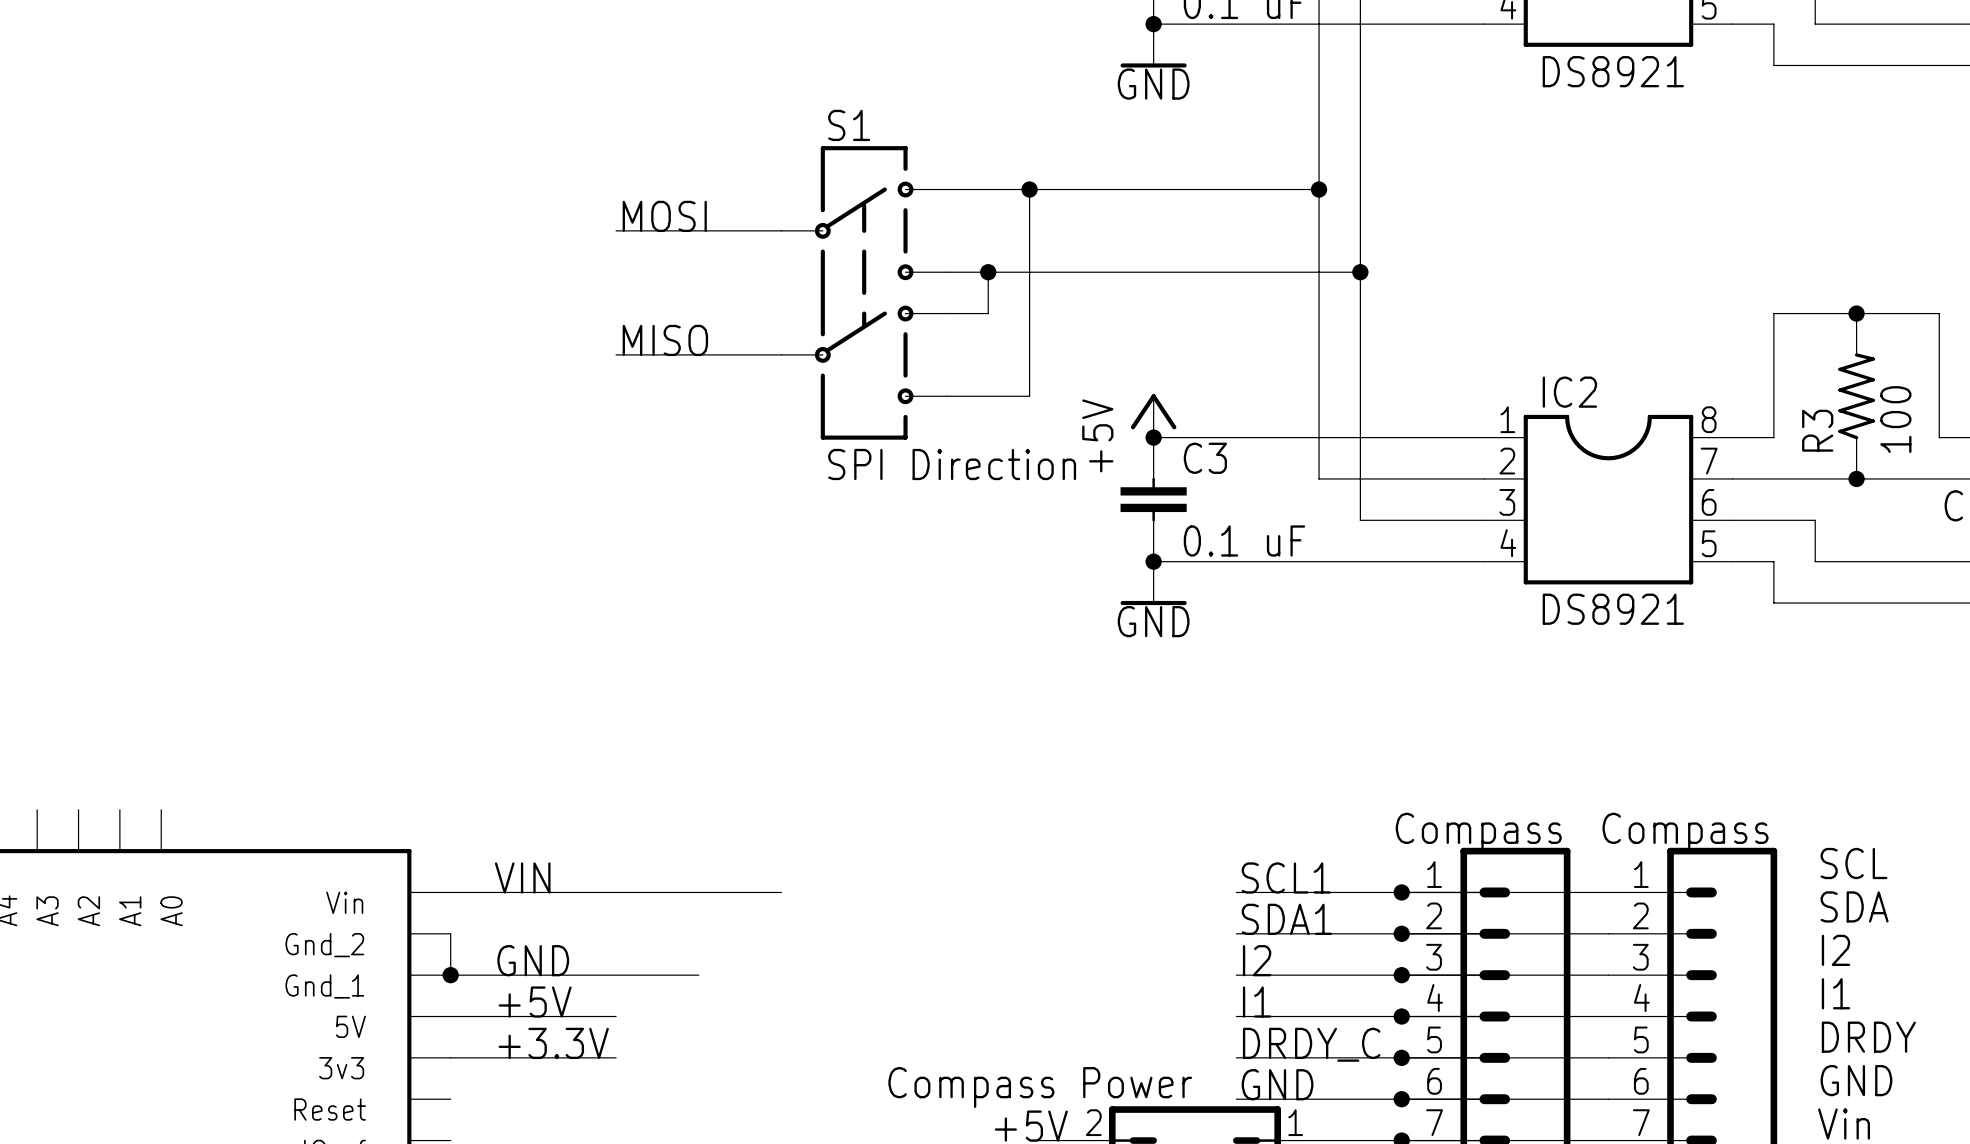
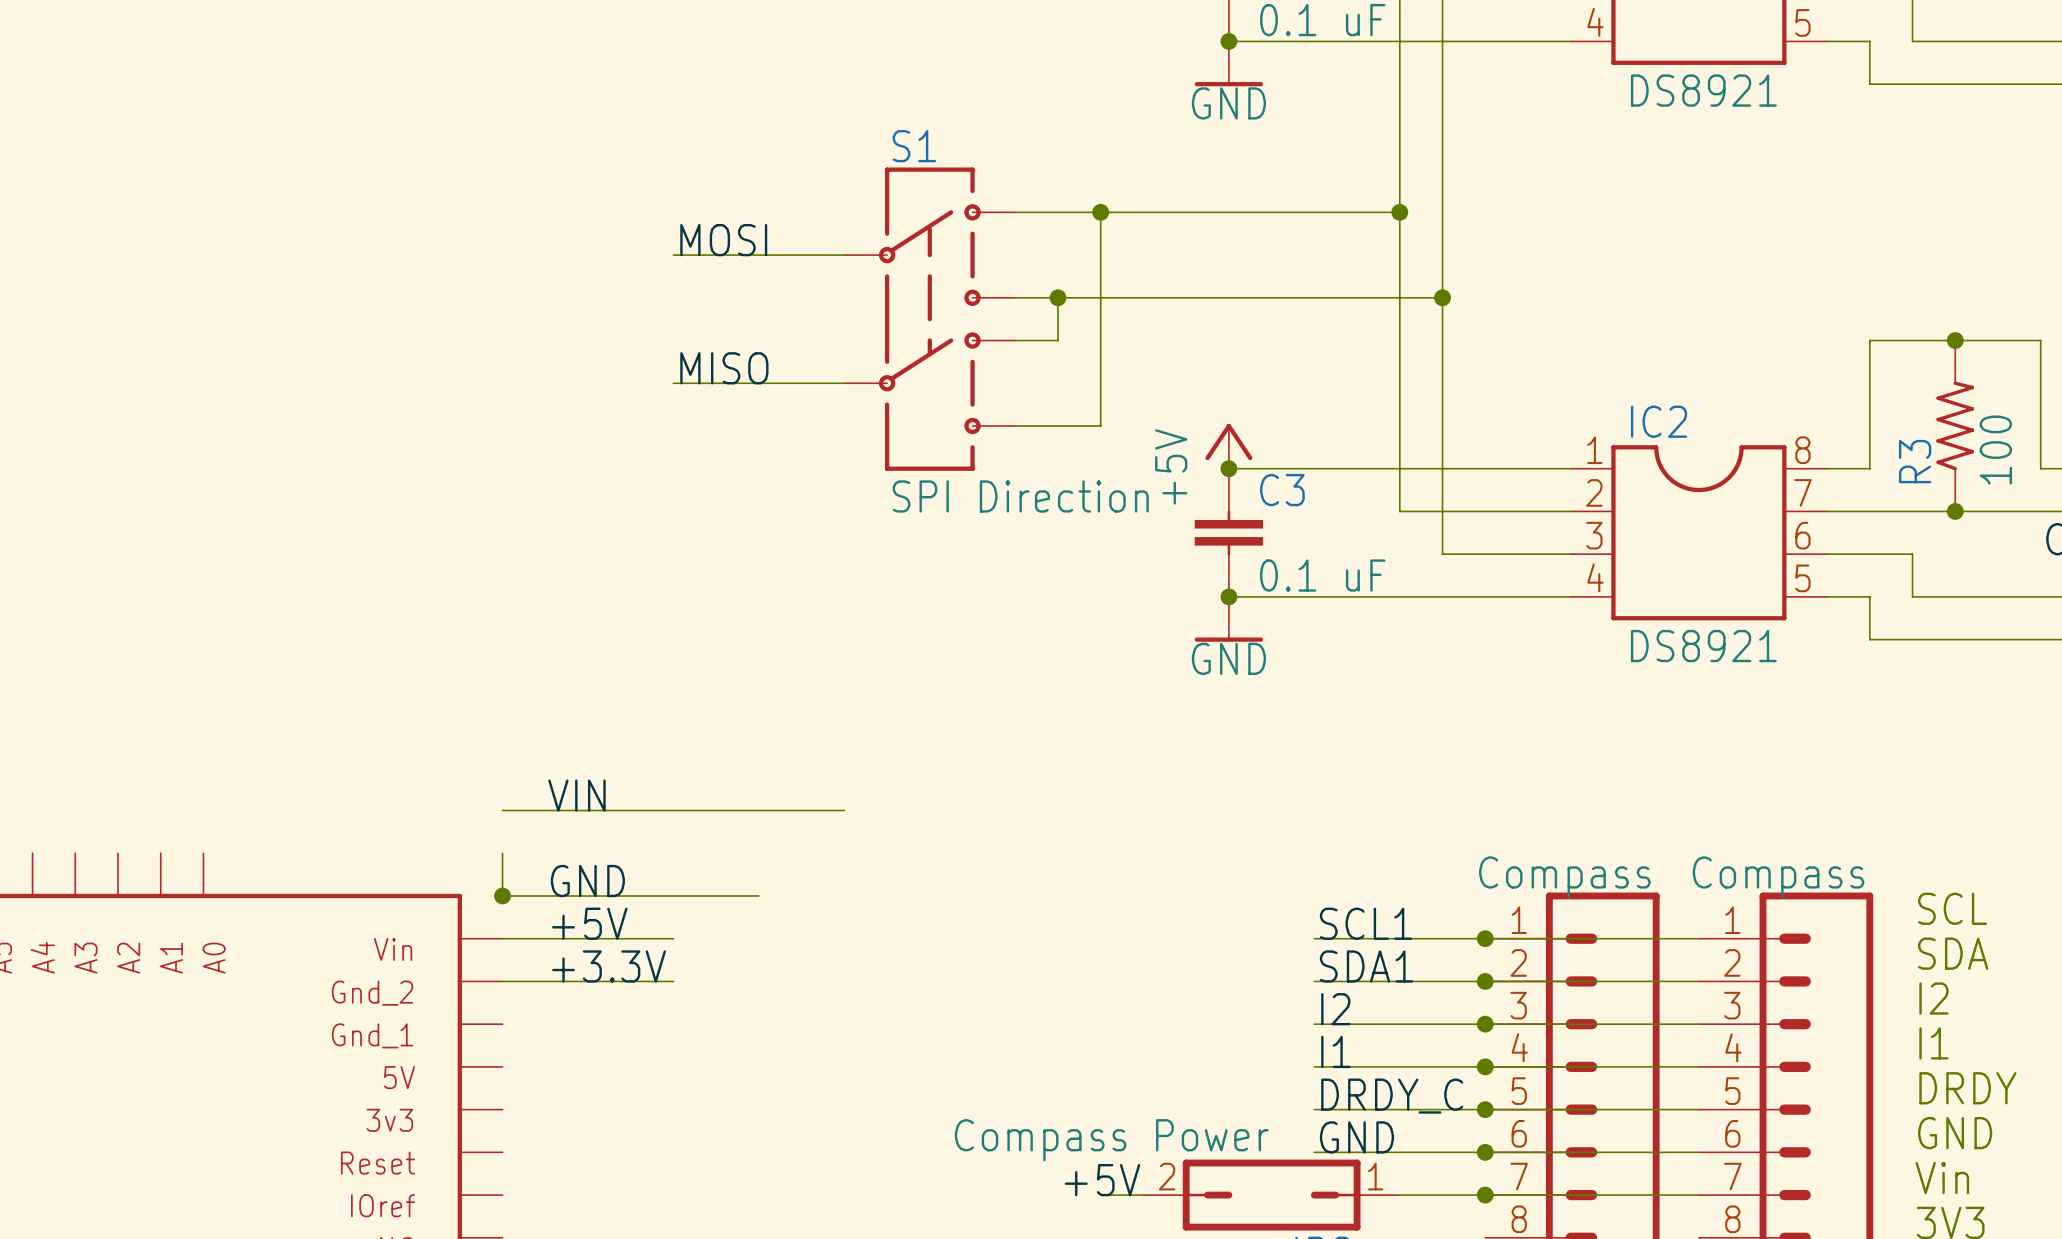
label: none -> VIN (576, 795)
wire: none -> (502, 810) (844, 810)
wire: none -> (502, 853) (502, 895) (758, 895)
junction: none -> (502, 895)
label: VIN (522, 877) -> +5V (589, 923)
wire: (616, 892) (781, 892) -> none
wire: (450, 933) (450, 975) (698, 975) -> (502, 981) (673, 981)
label position: GND (533, 960) -> GND (587, 881)
junction: (450, 975) -> none
label: +5V (535, 1002) -> none
wire: (450, 1016) (616, 1016) -> none
label position: +3.3V (553, 1043) -> +3.3V (609, 966)
wire: (450, 1057) (616, 1057) -> none

